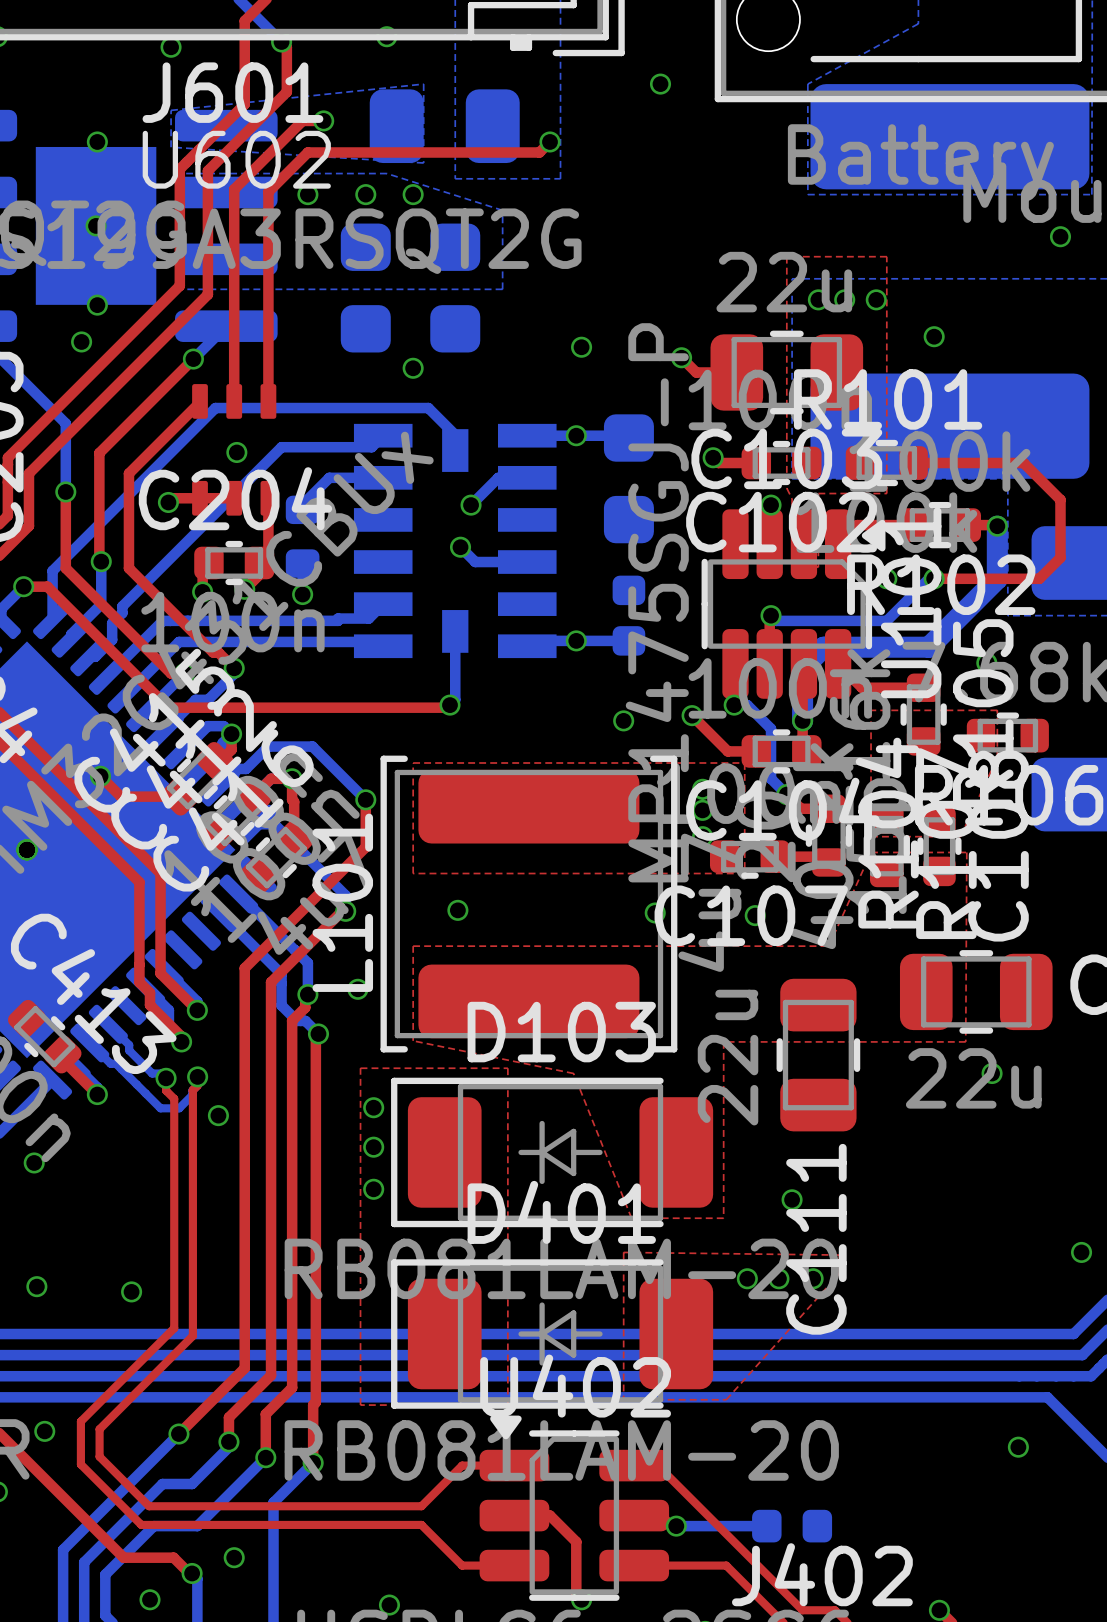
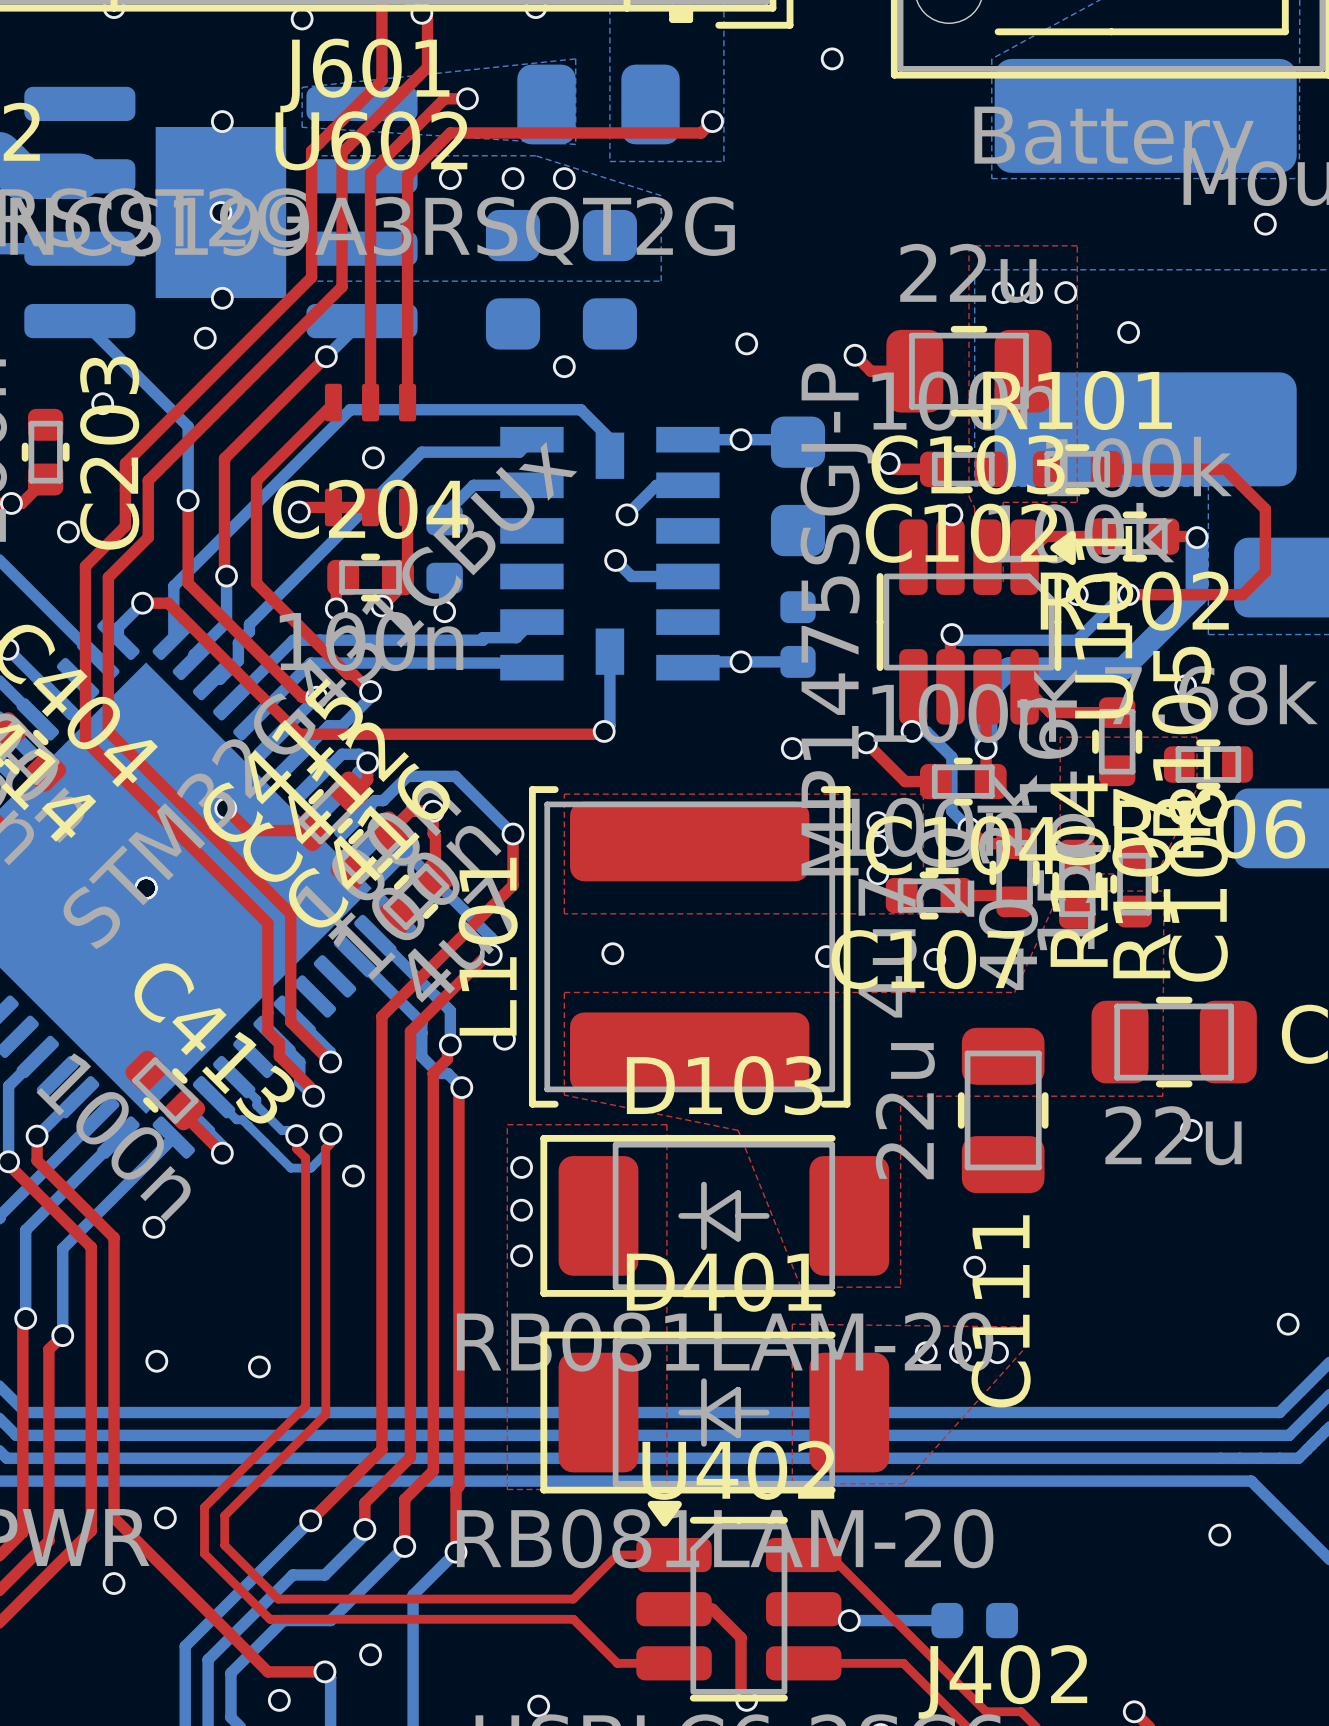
top track: (123, 1557) (173, 1557) (189, 1573) -> (250, 1654) (267, 1671) (322, 1671)

